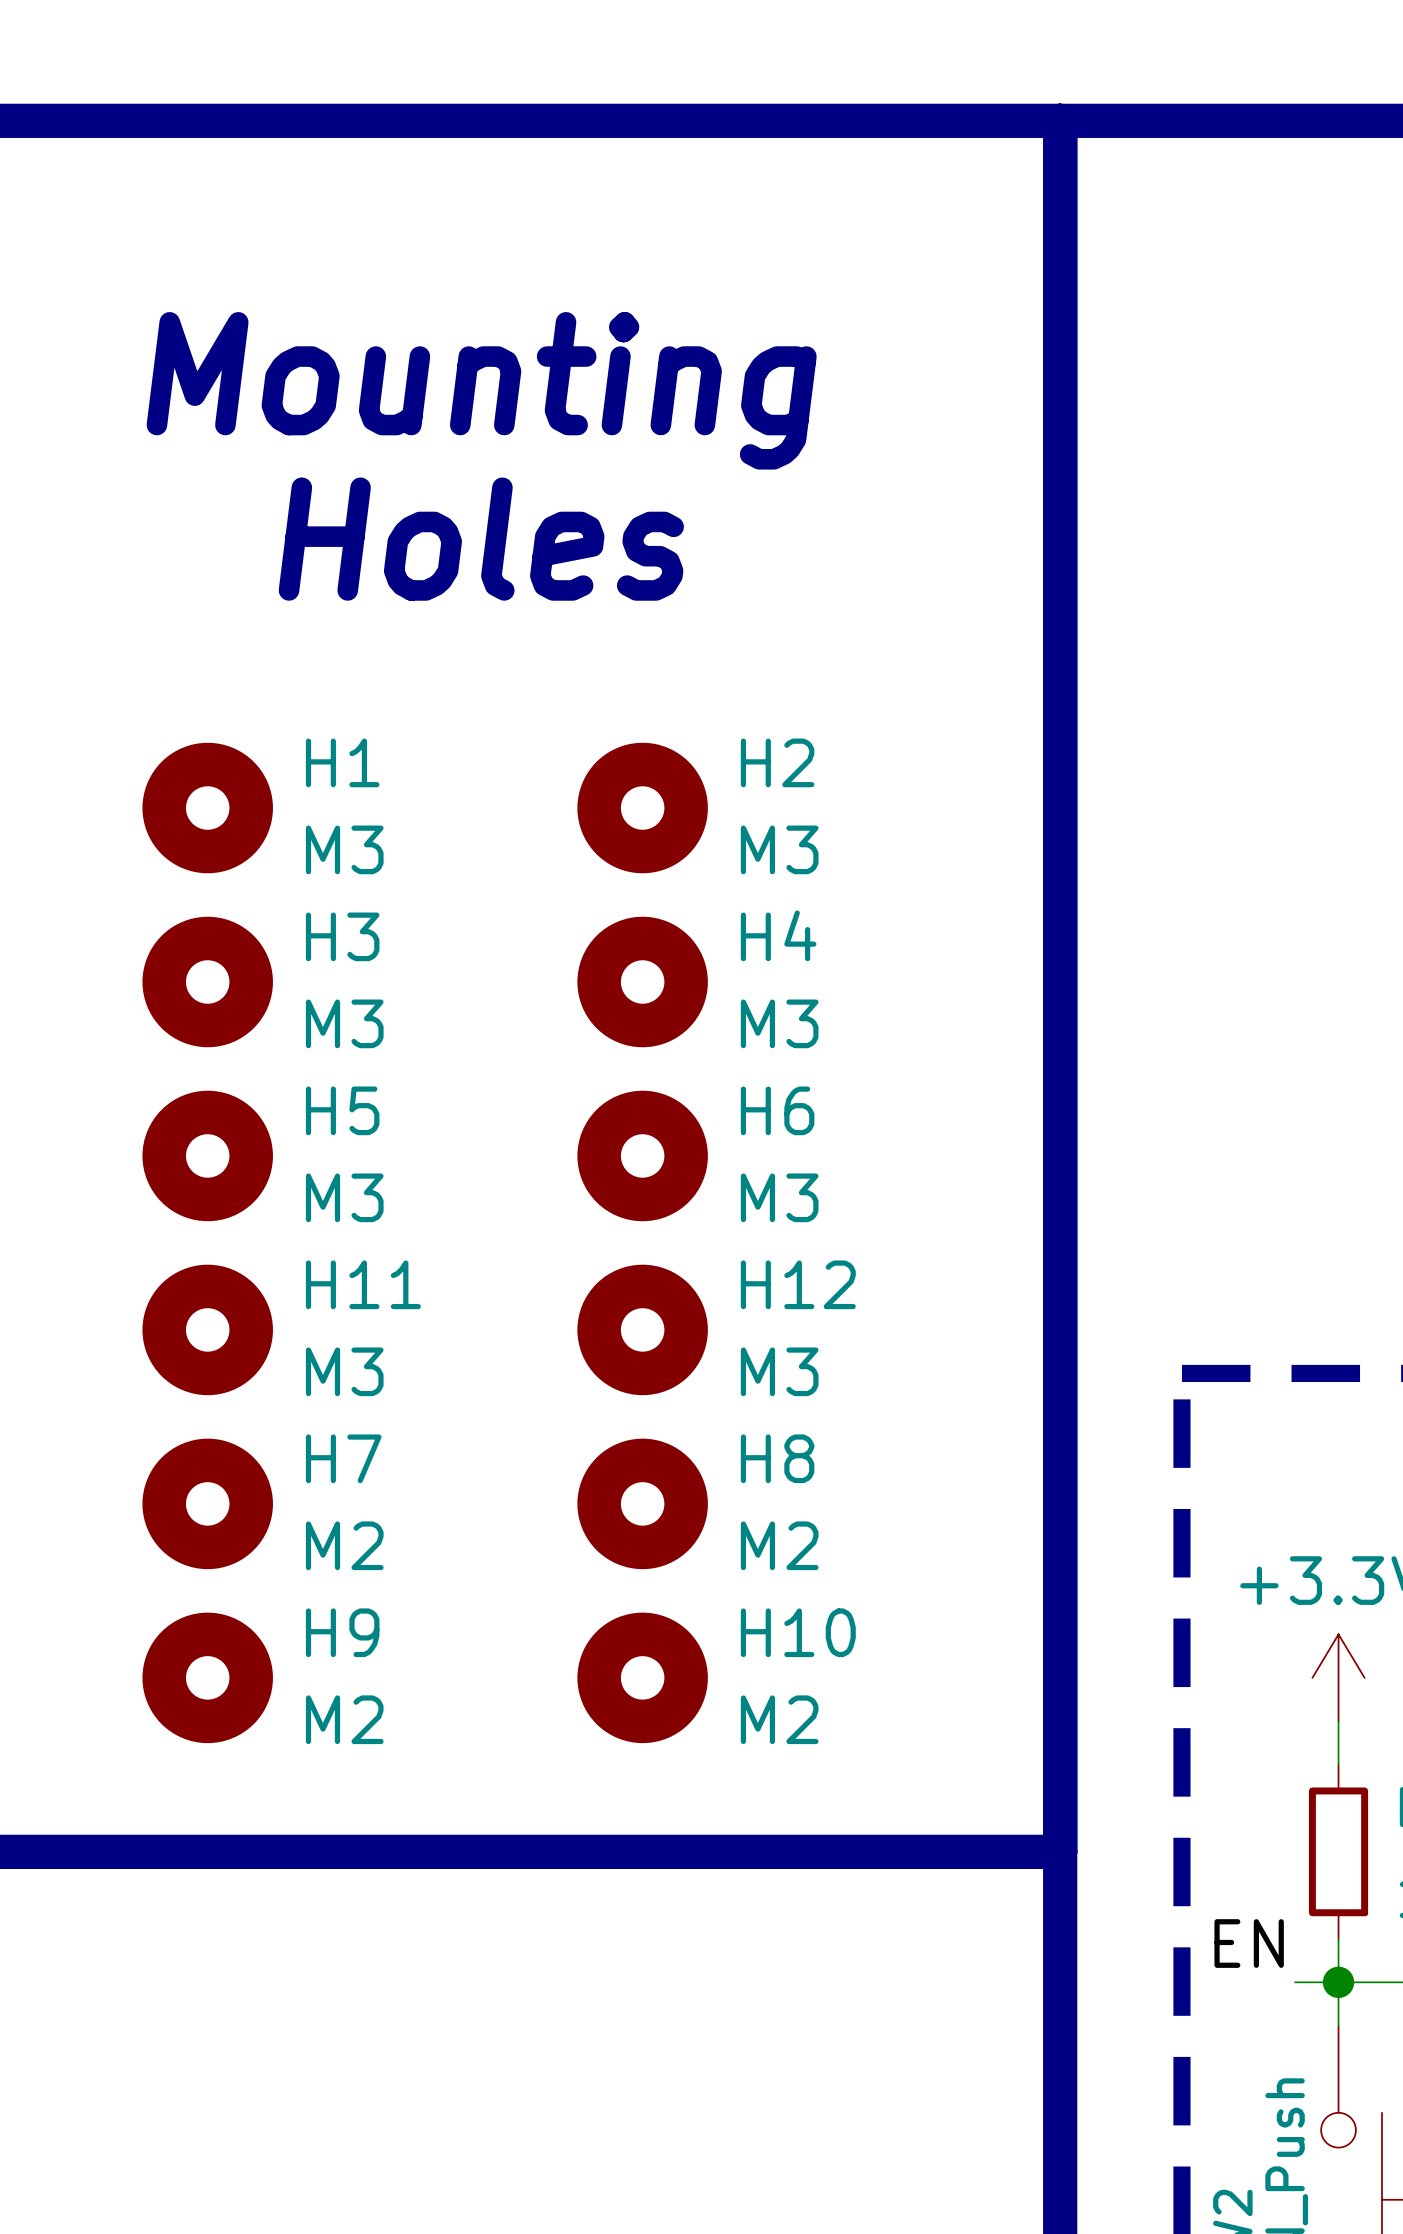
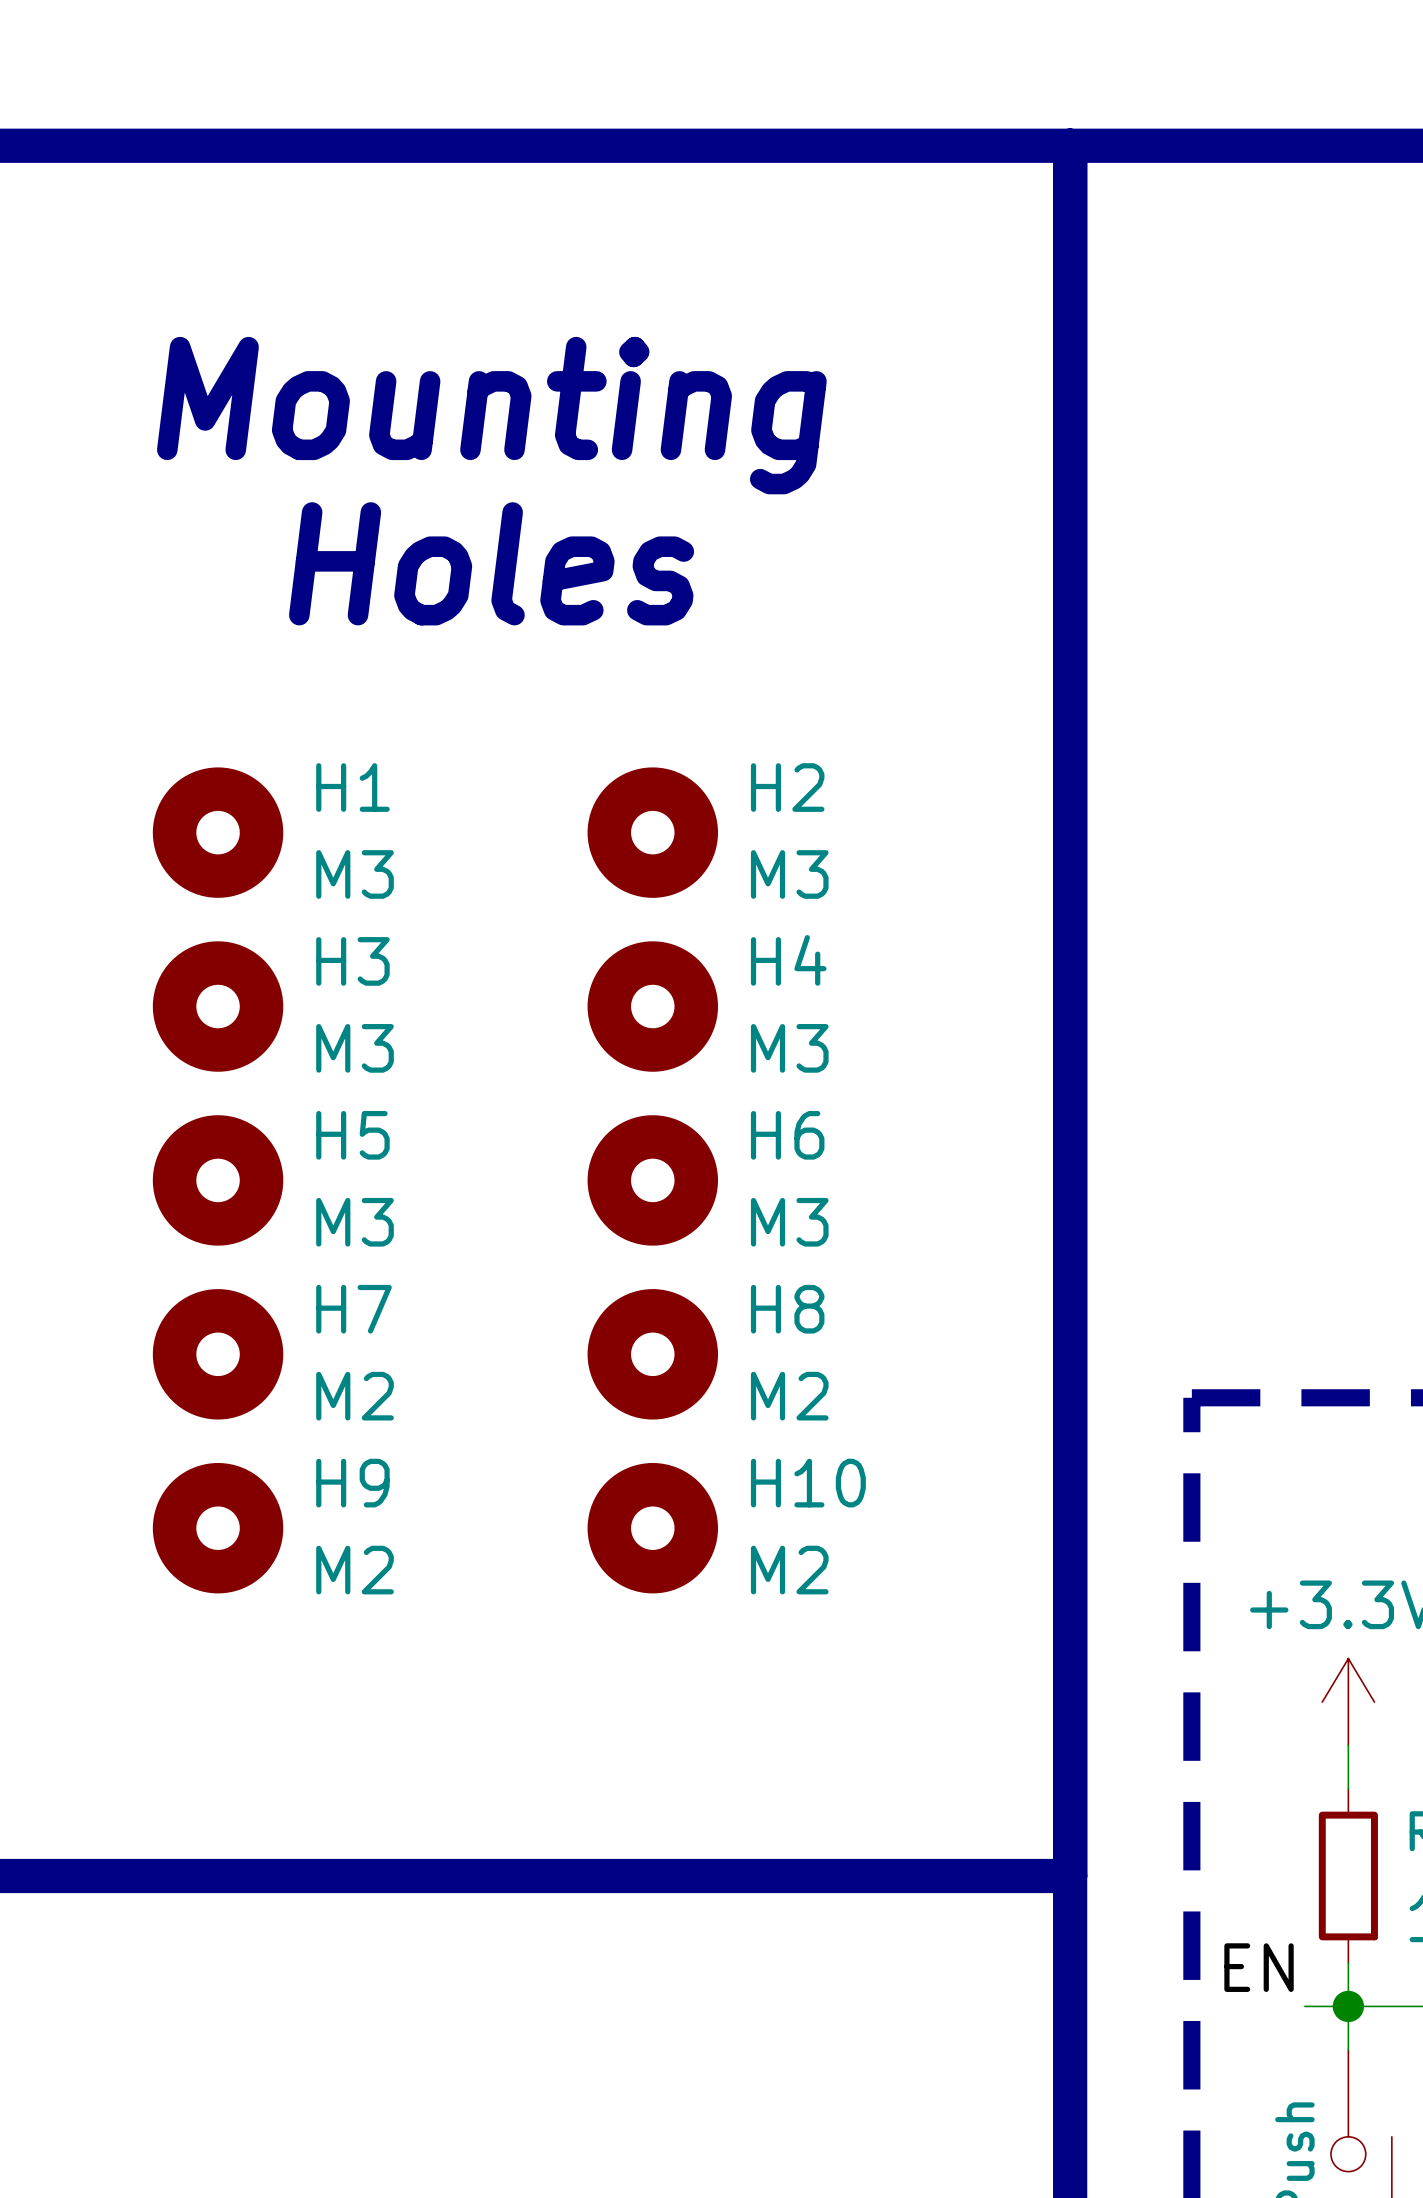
H11 name: H11 (363, 1284) -> H7 (353, 1309)
H12 name: H12 (798, 1284) -> H8 (787, 1309)
H11 value: M3 (344, 1371) -> M2 (355, 1396)
H12 value: M3 (779, 1371) -> M2 (789, 1396)
H7 name: H7 (343, 1458) -> H9 (352, 1483)
H8 name: H8 (777, 1458) -> H10 (808, 1483)
H9: M2 (207, 1677) -> none
H10: M2 (642, 1677) -> none

